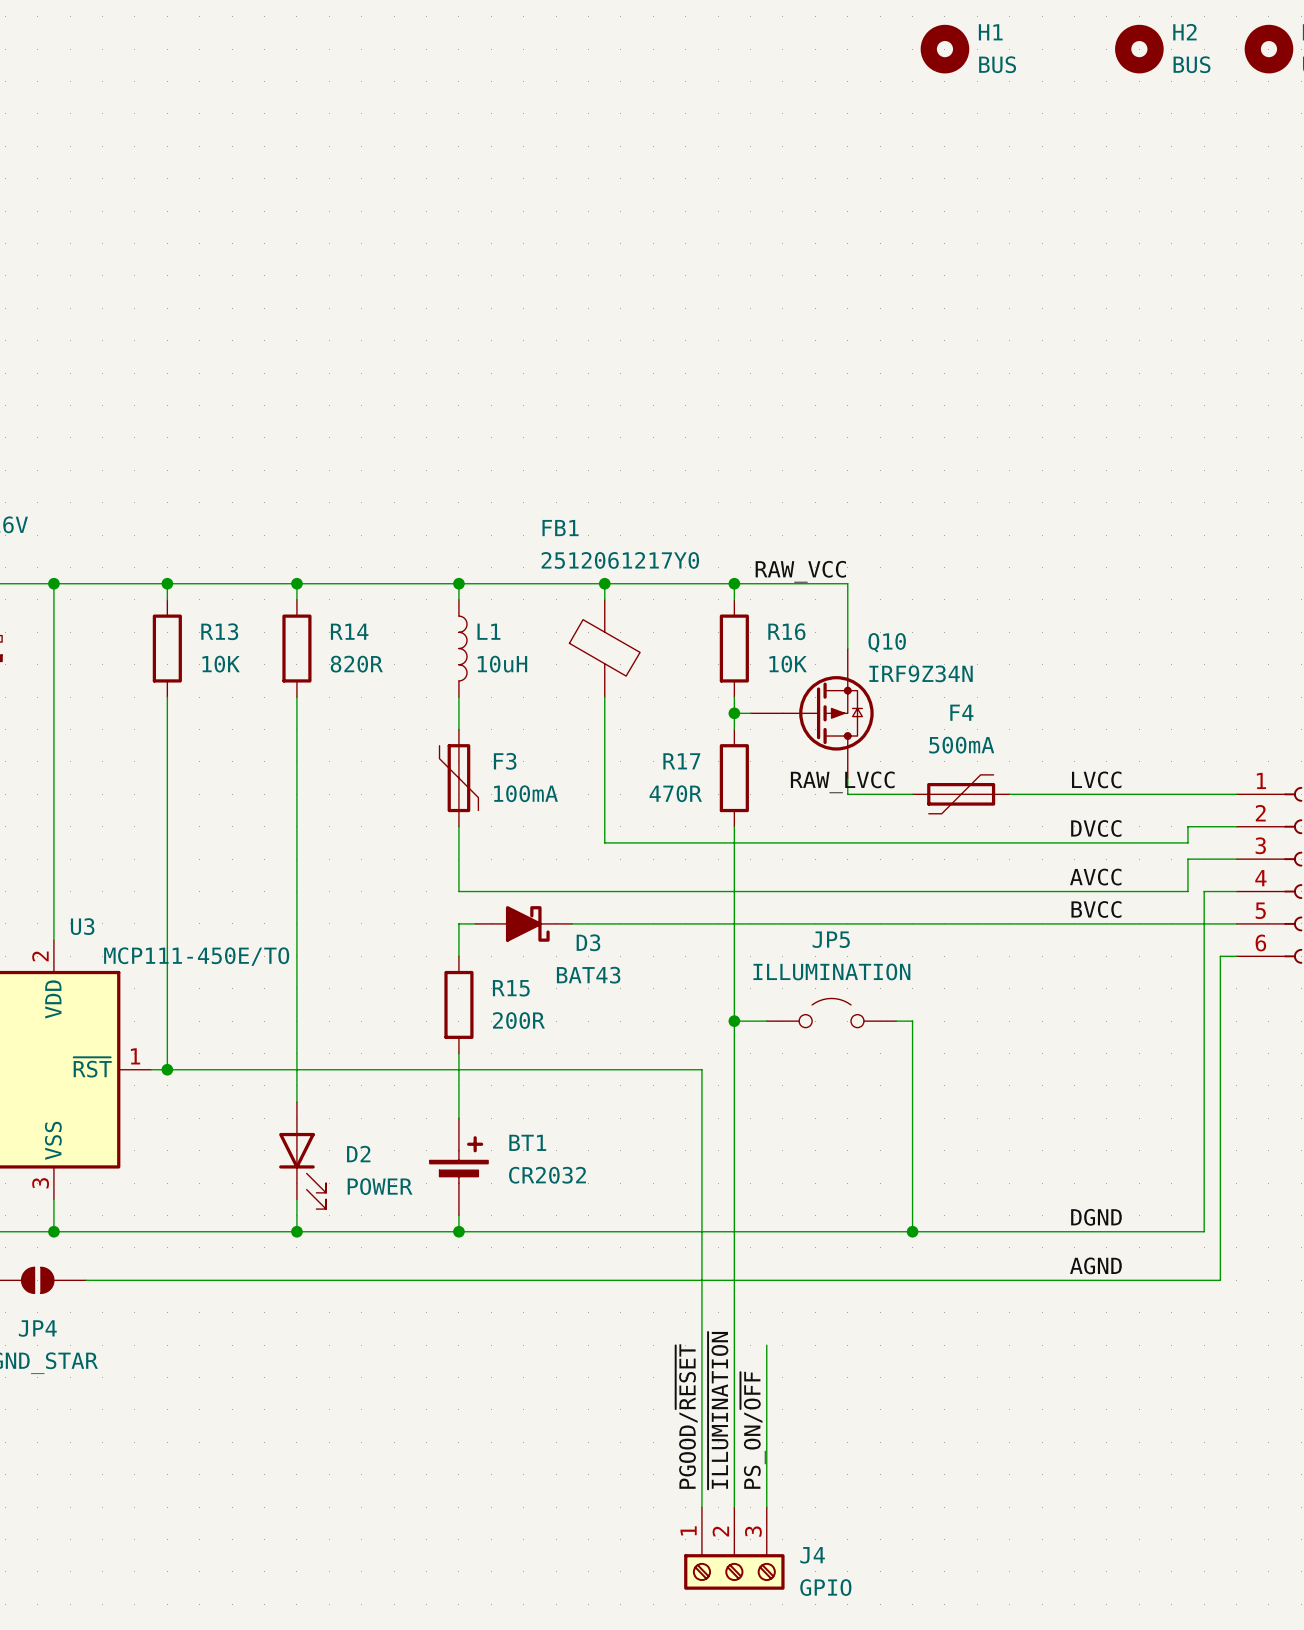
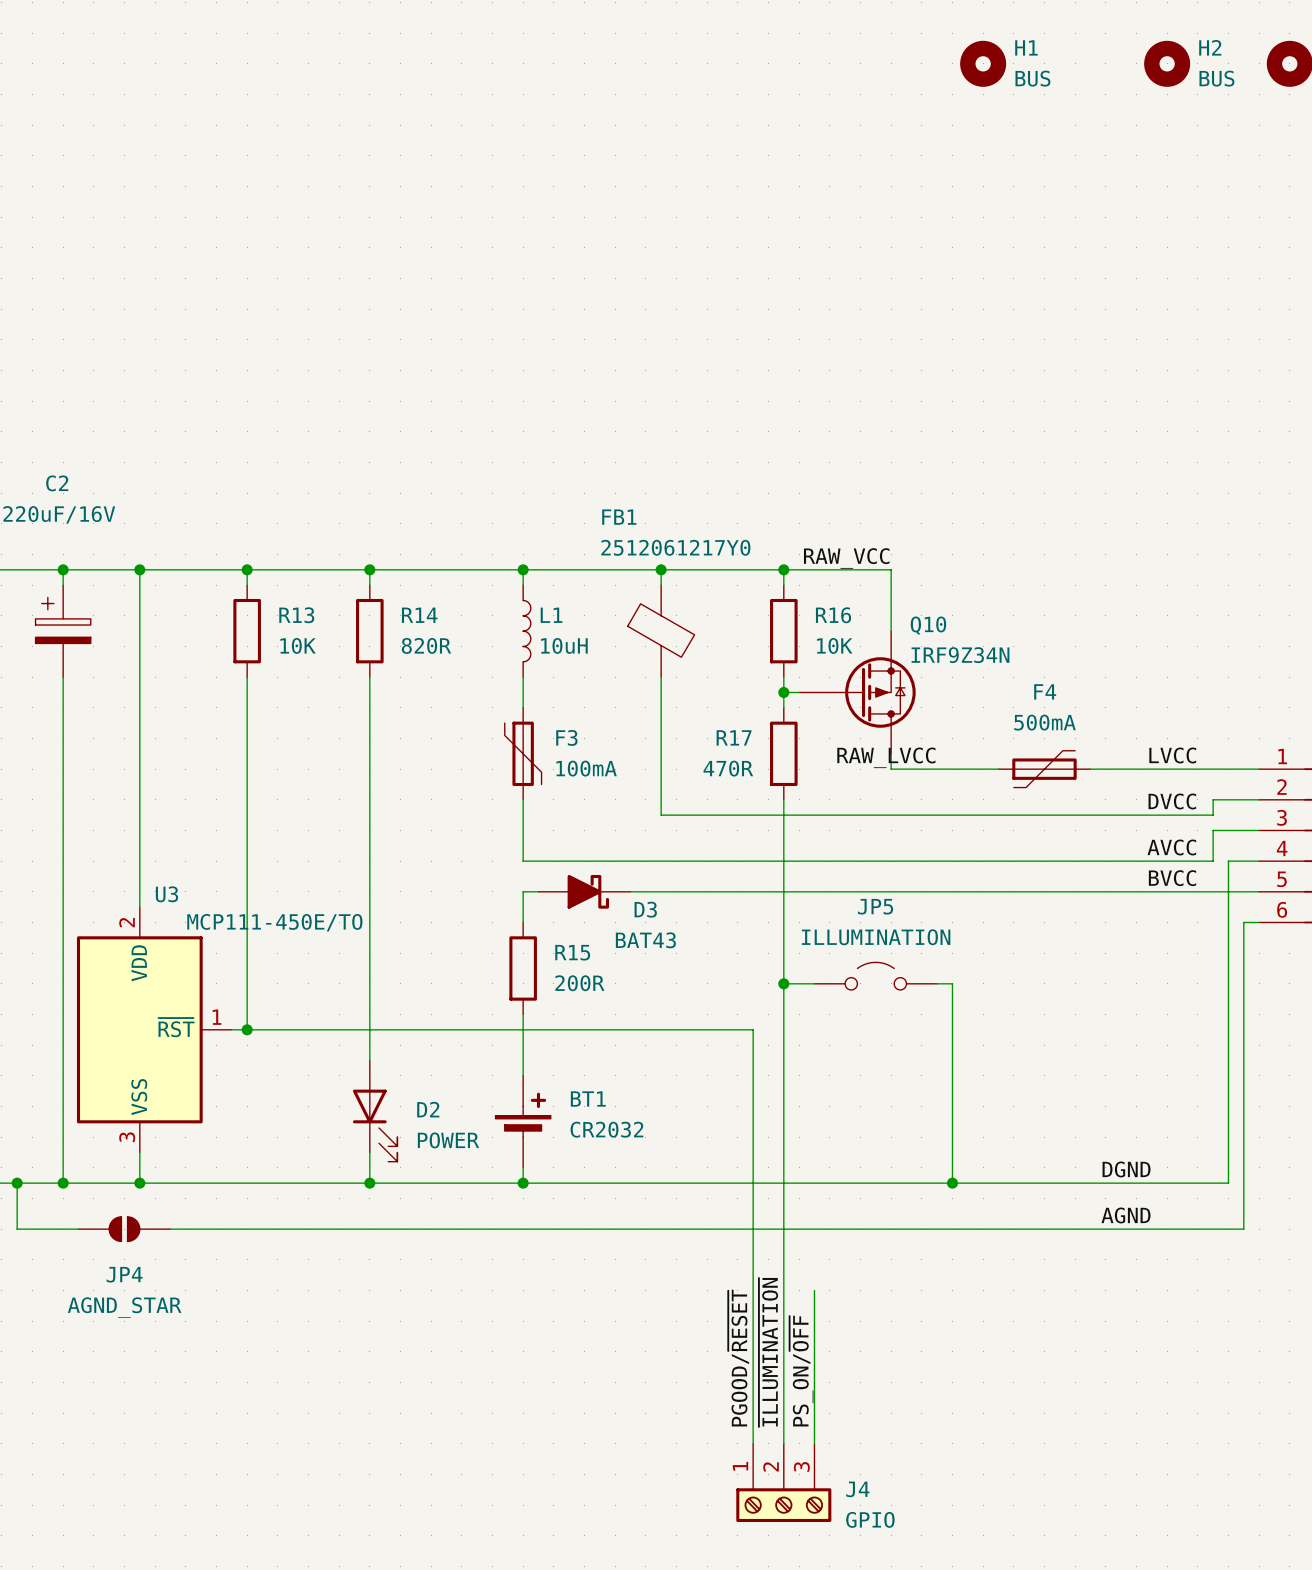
label position: LVCC (1096, 779) -> LVCC (1172, 755)
F4 position: (961, 794) -> (1044, 769)
label position: DVCC (1096, 828) -> DVCC (1172, 801)
label position: AVCC (1095, 877) -> AVCC (1171, 847)
label position: BVCC (1096, 909) -> BVCC (1172, 878)

